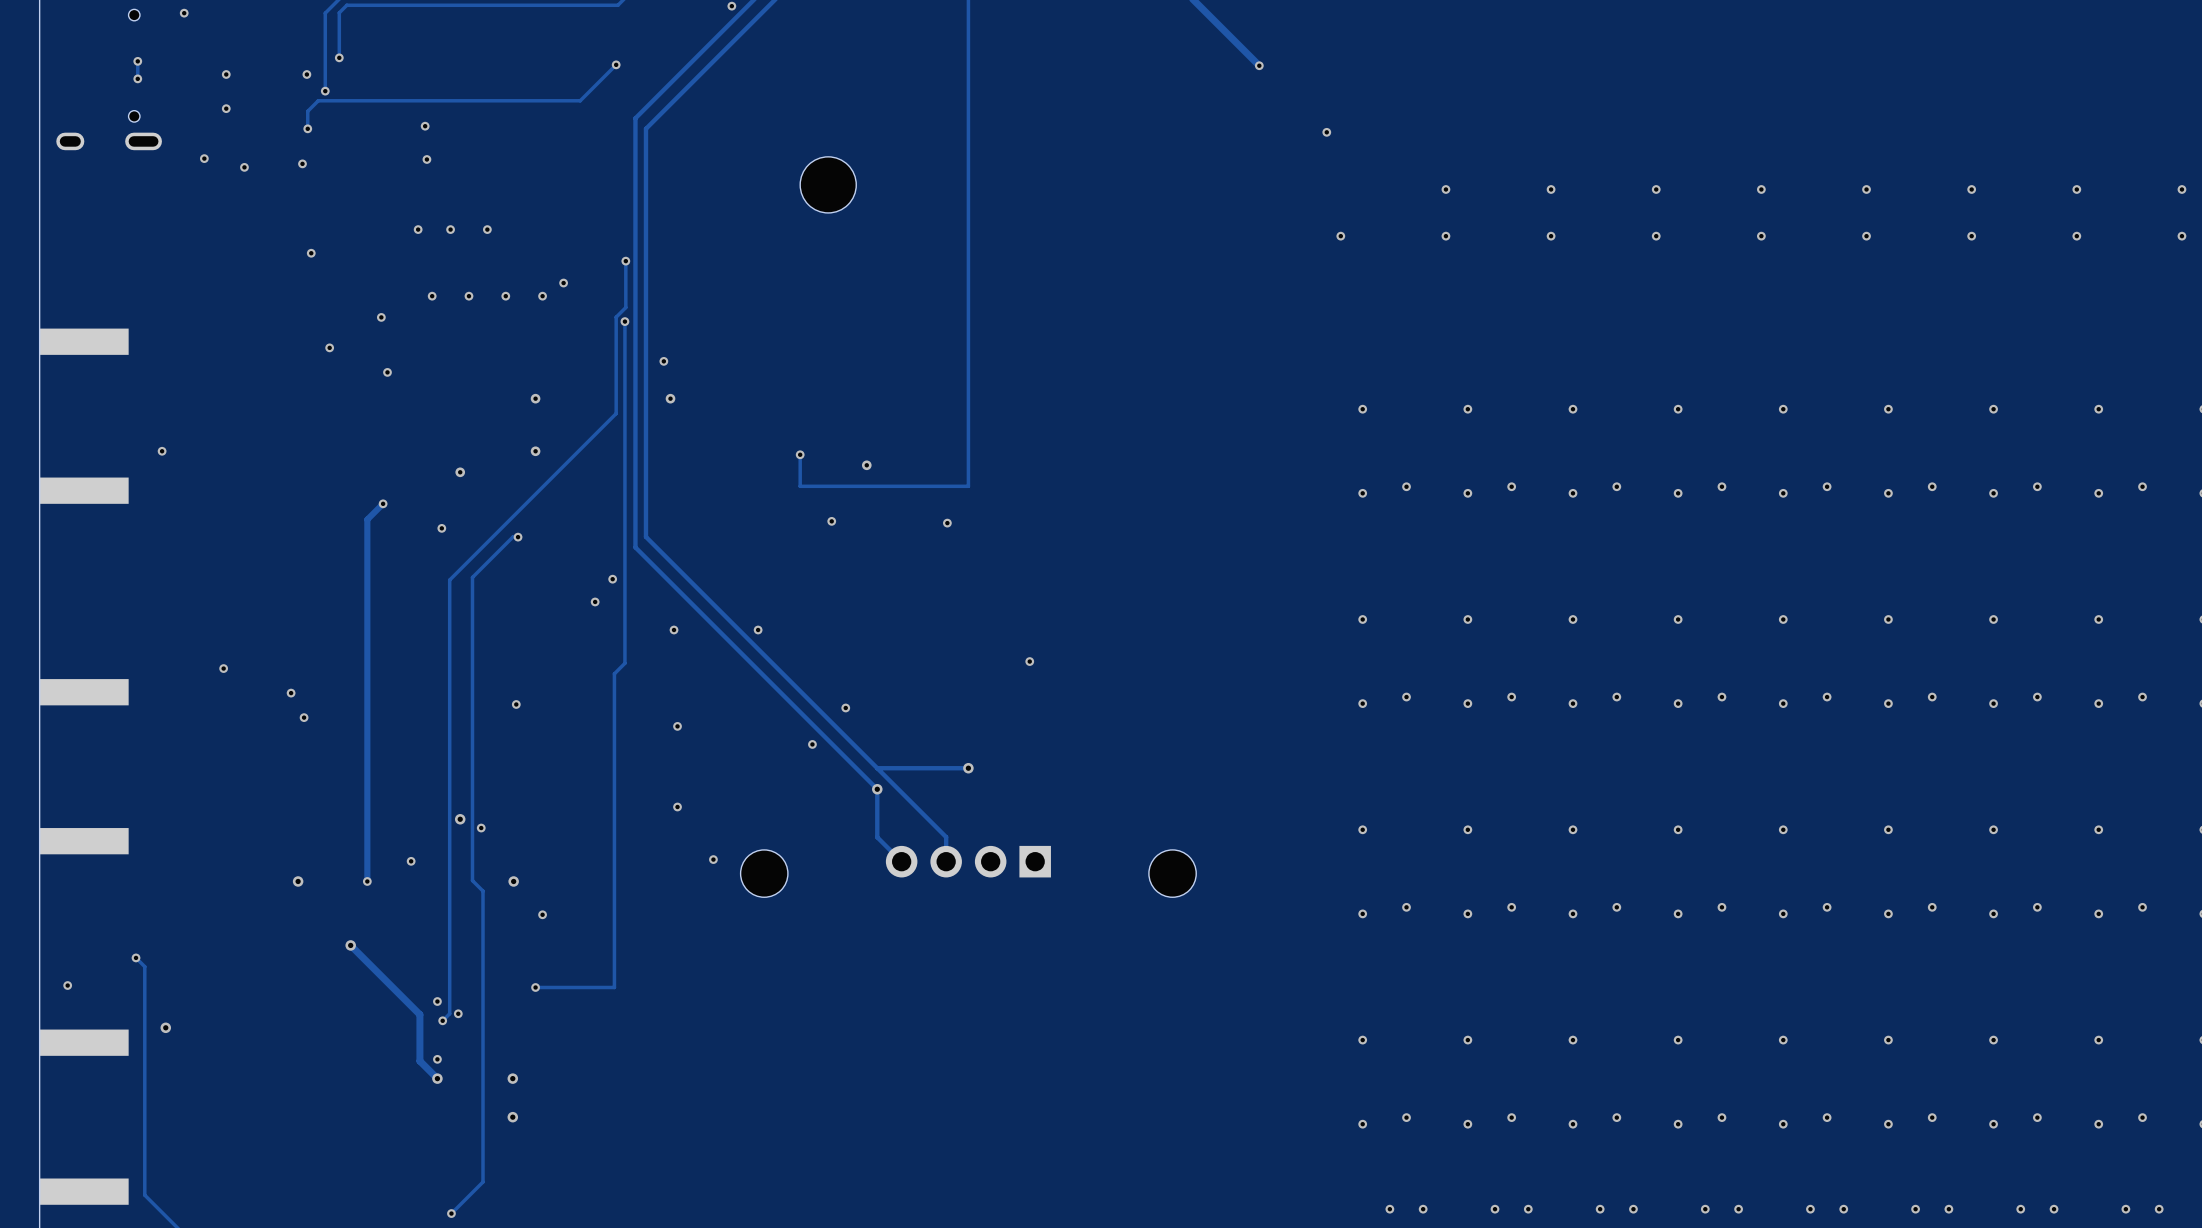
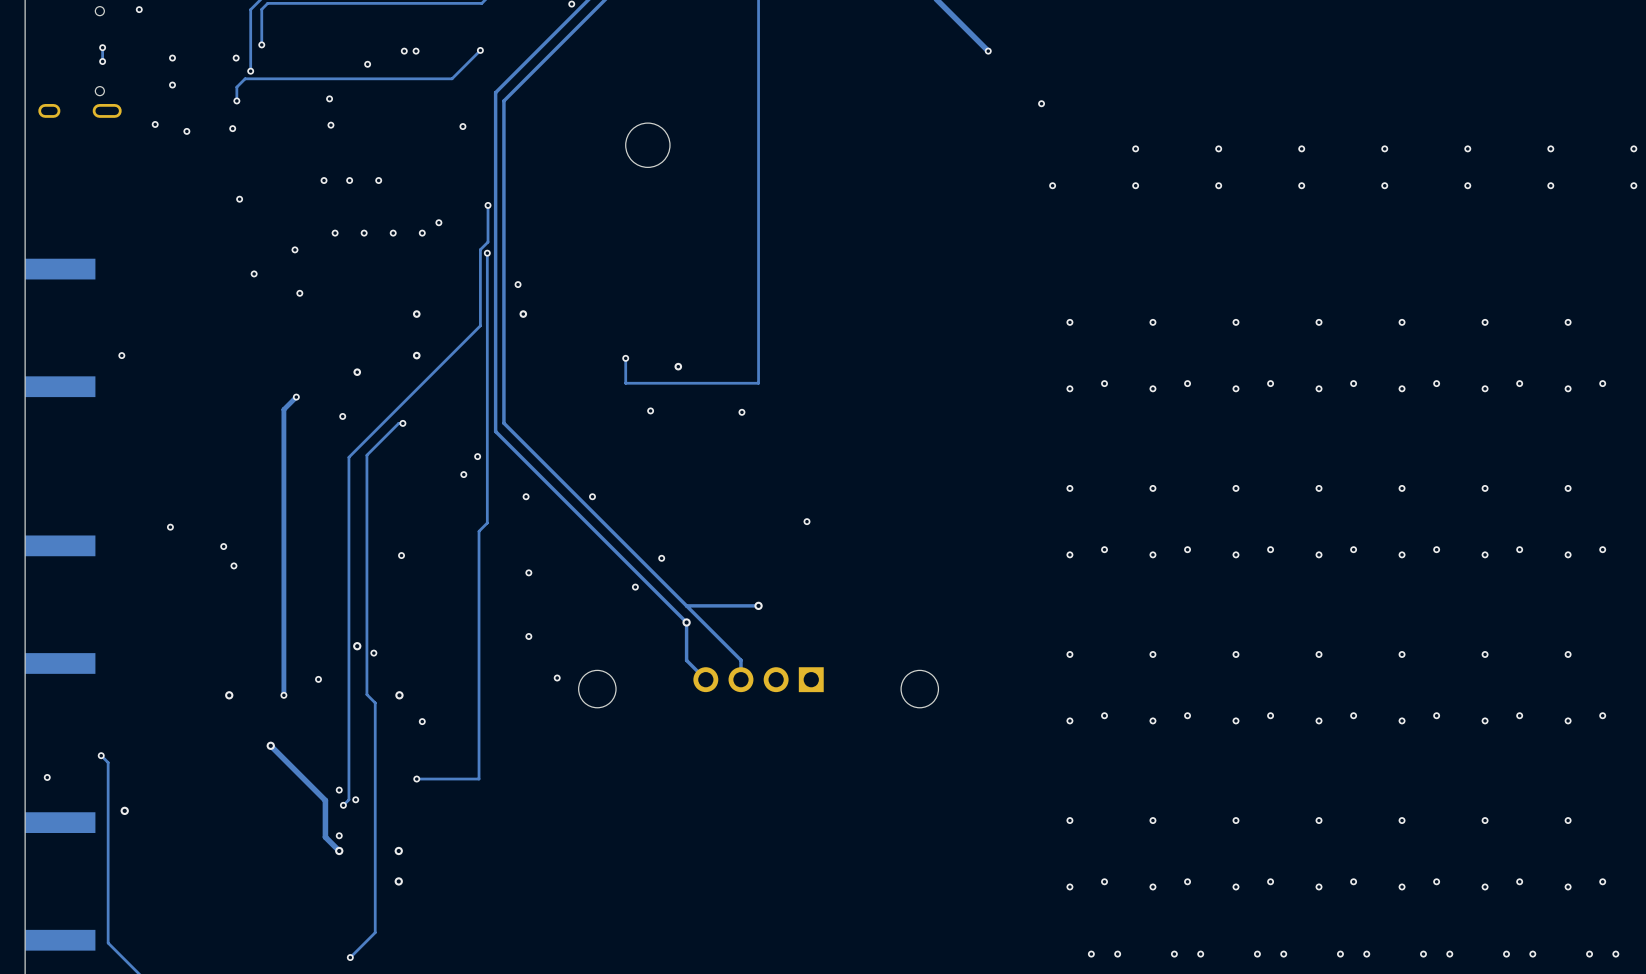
via: none -> (404, 51)
via: none -> (416, 51)
via: none -> (367, 64)
via: none -> (462, 126)

